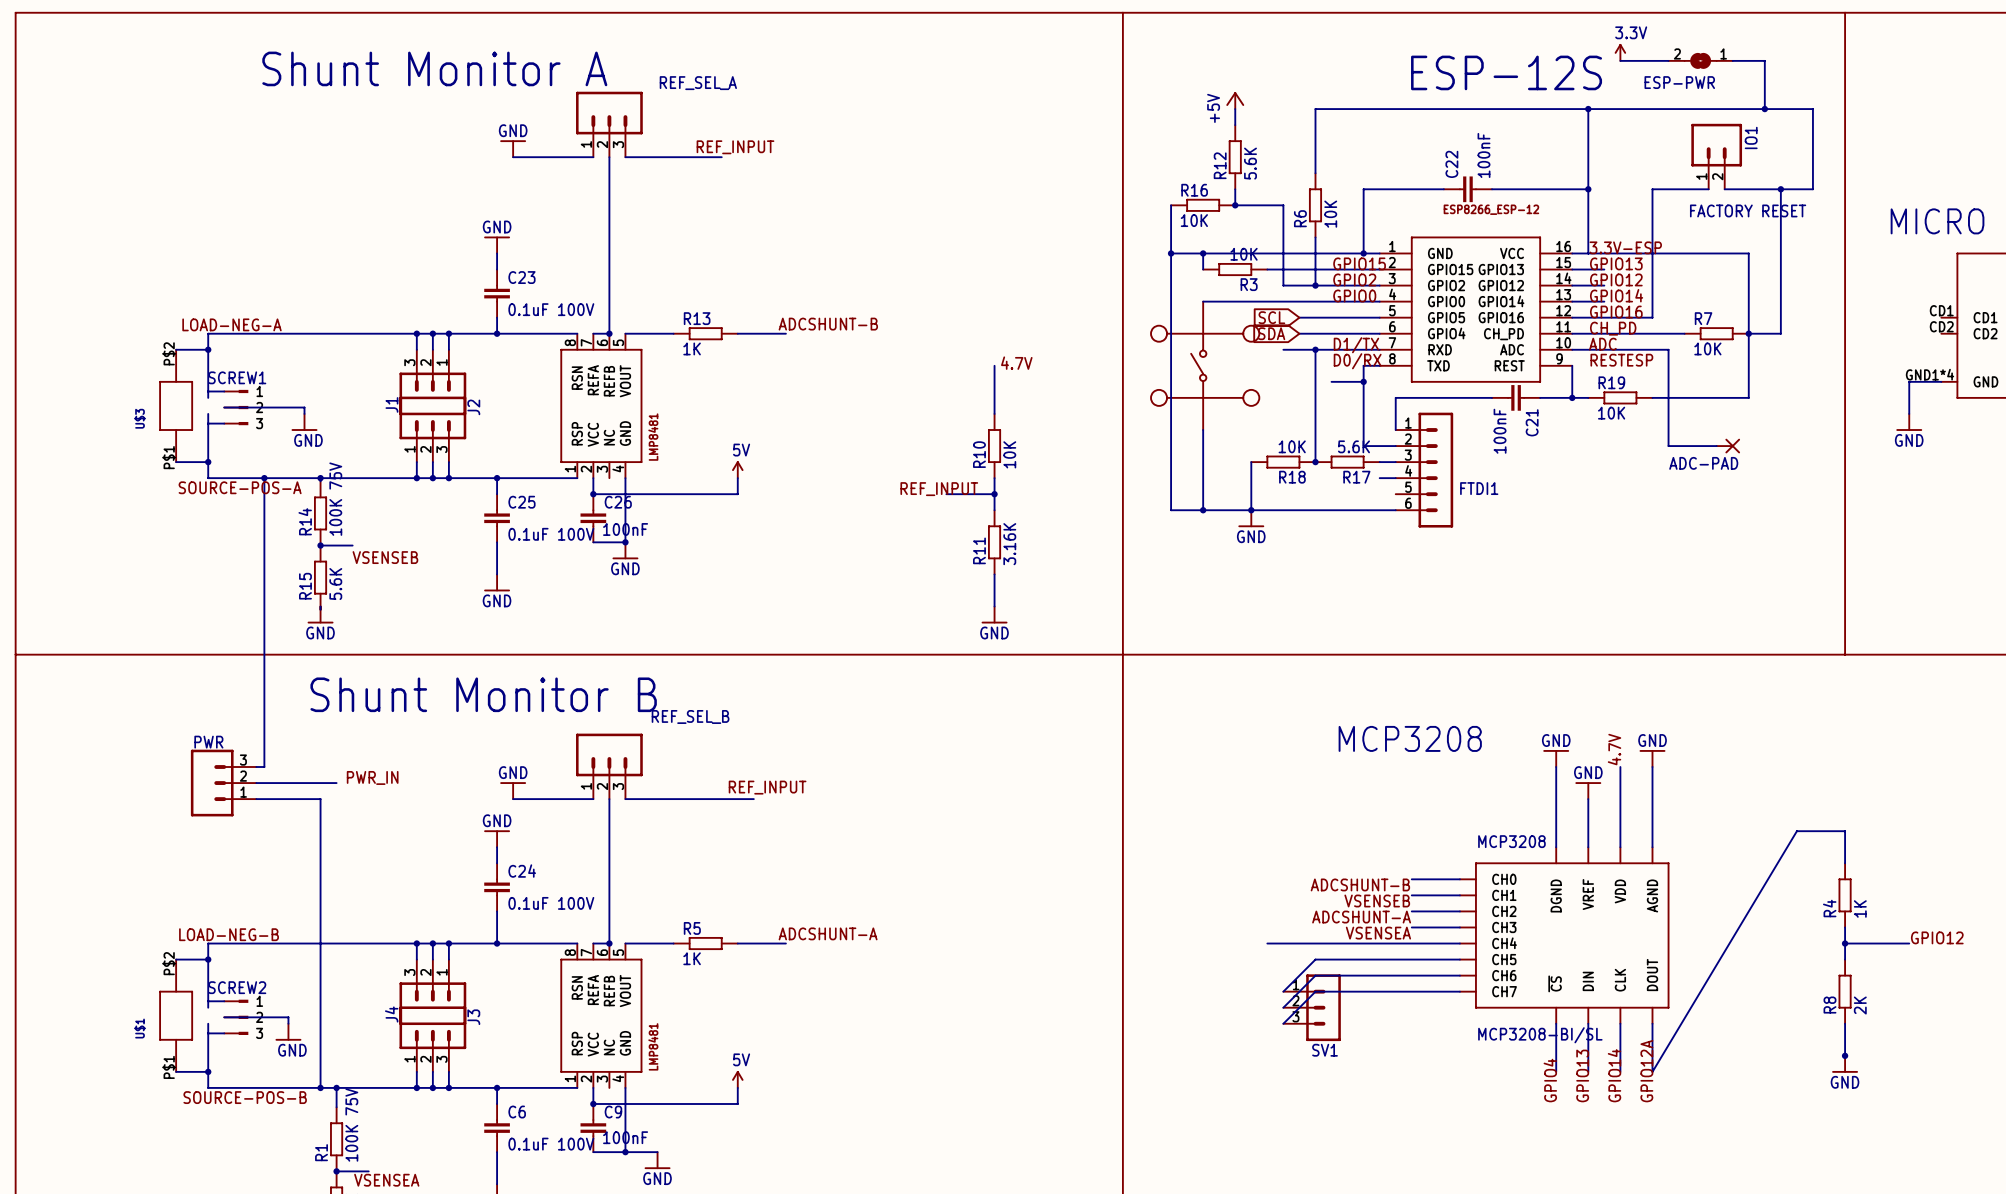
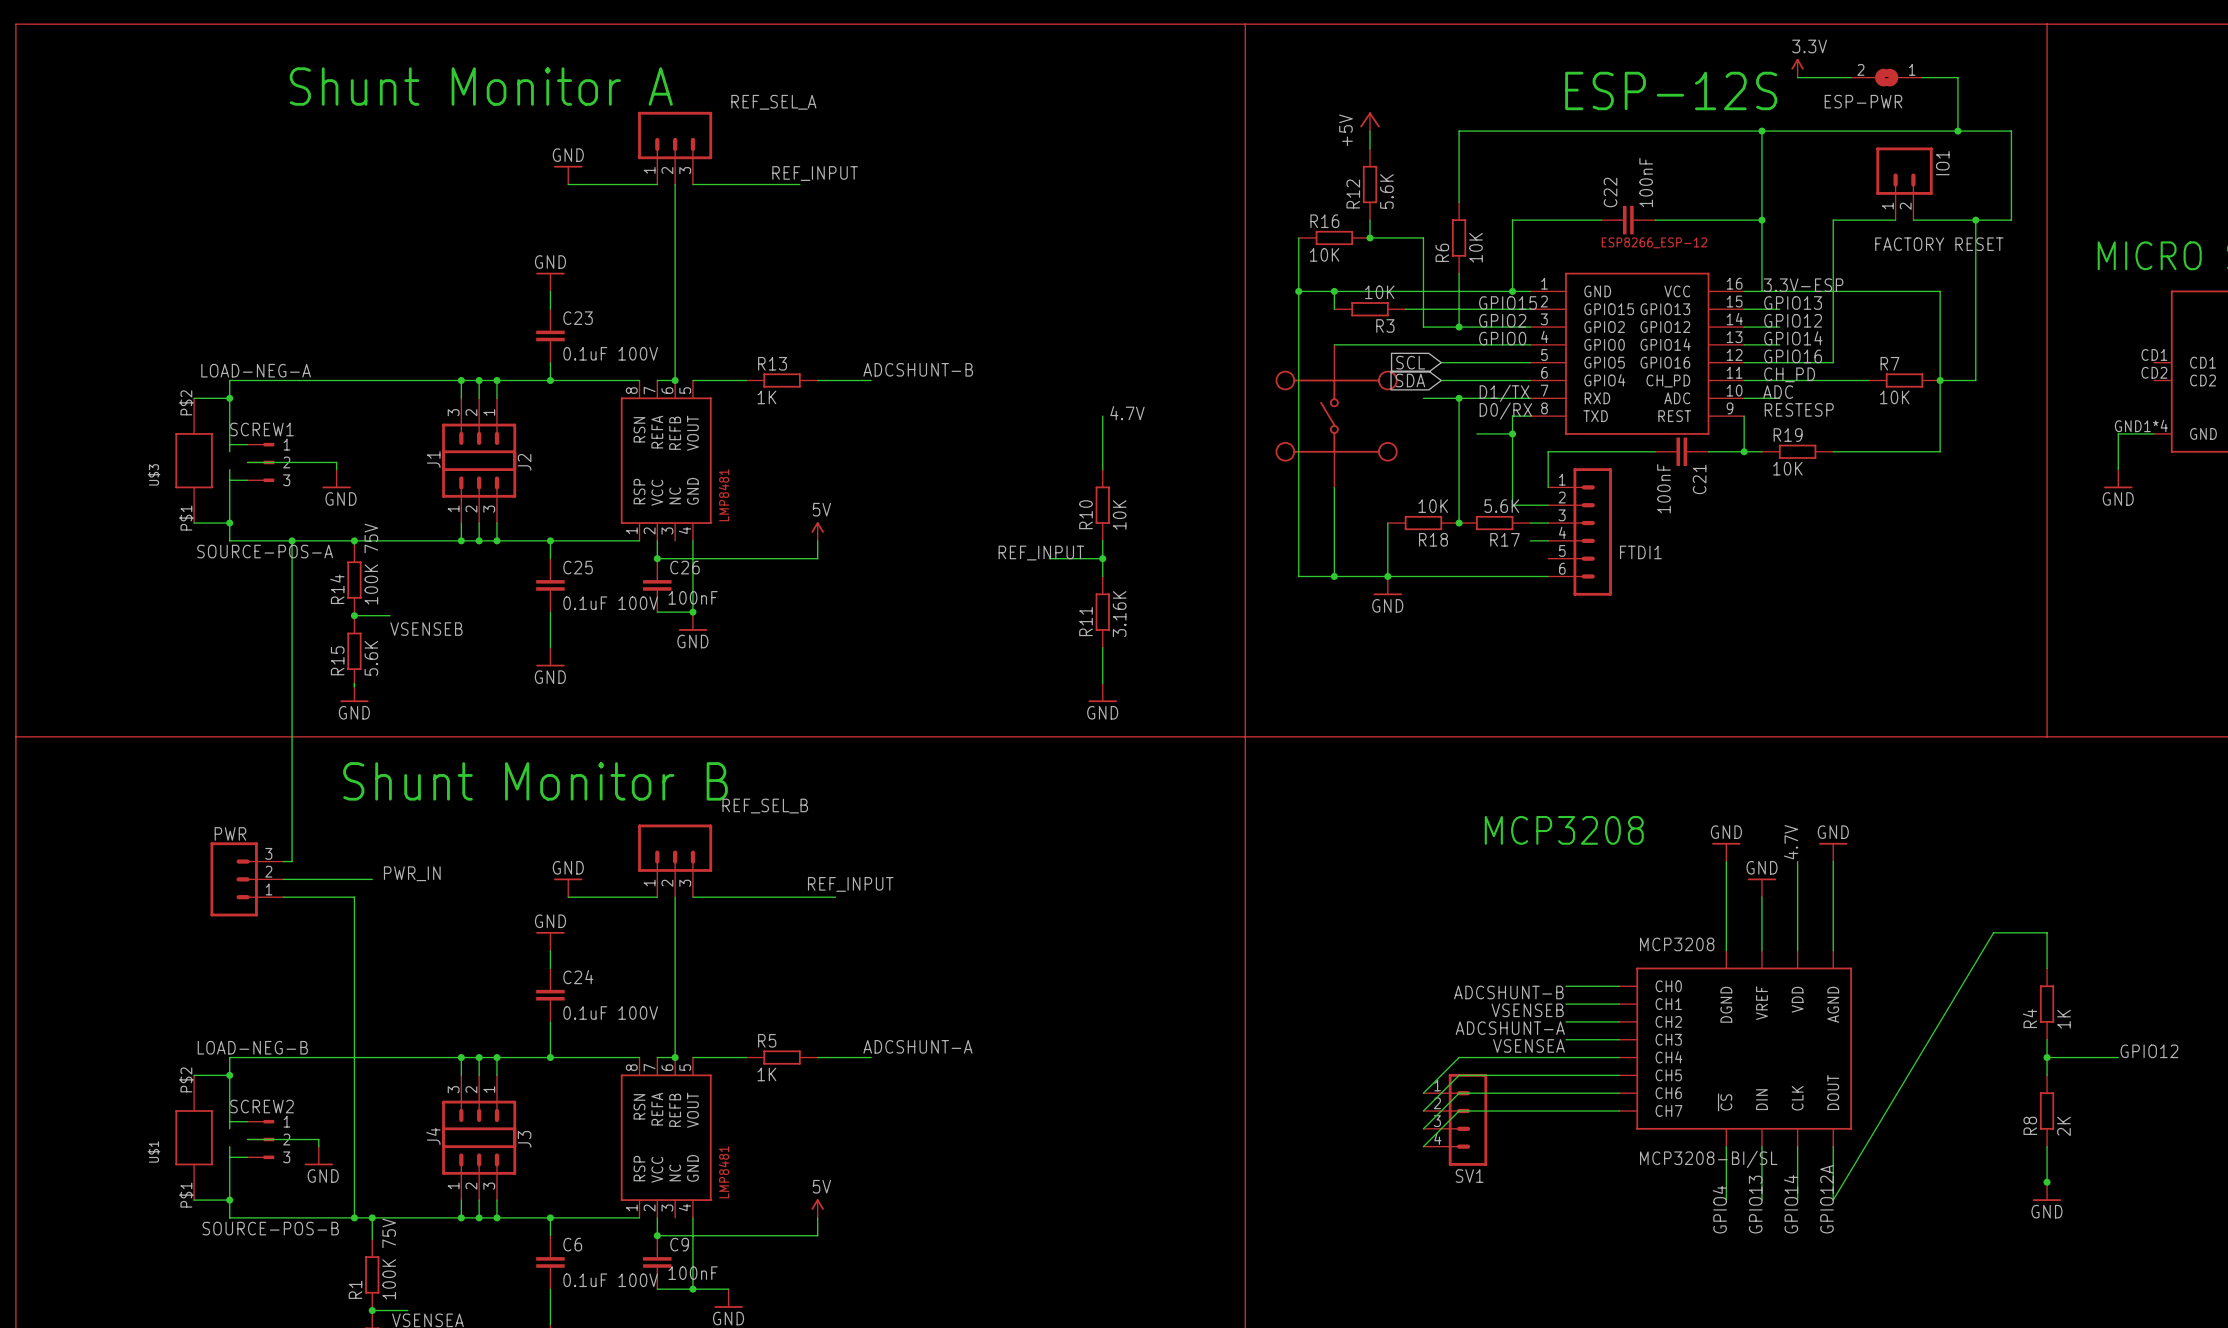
wire: (1604, 349) (1668, 349) (1668, 446) (1716, 446) -> none
ADC-PAD: (1728, 446) -> none
wire: (1267, 943) (1315, 943) -> (1423, 1093) (1459, 1057)
SV1 symbol: [1283, 974, 1341, 1042] -> [1423, 1073, 1488, 1166]

